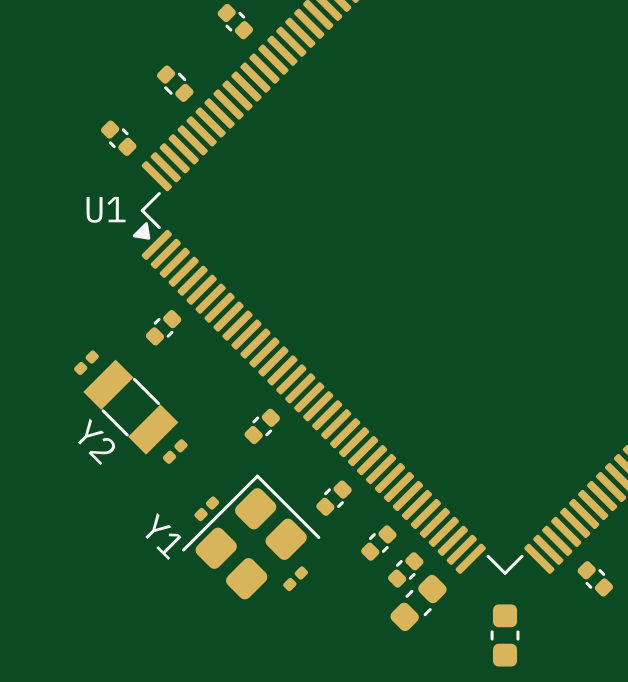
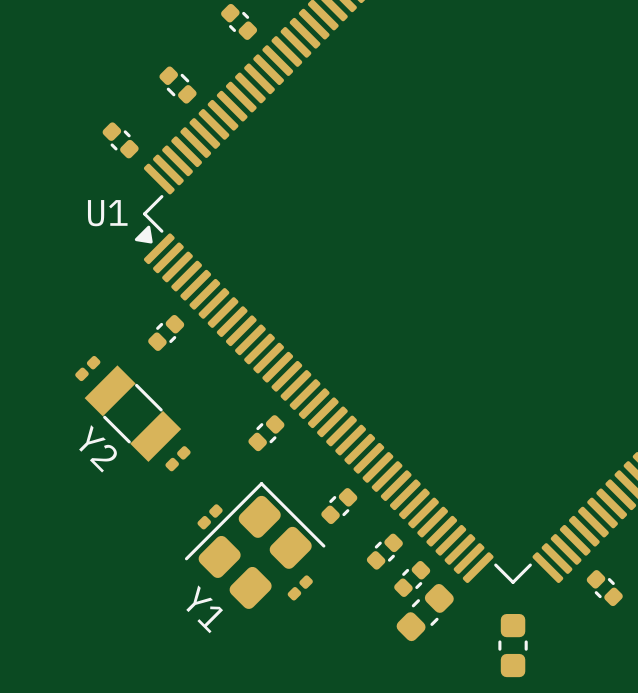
Y1 name position: Y1 (163, 536) -> Y1 (204, 609)

